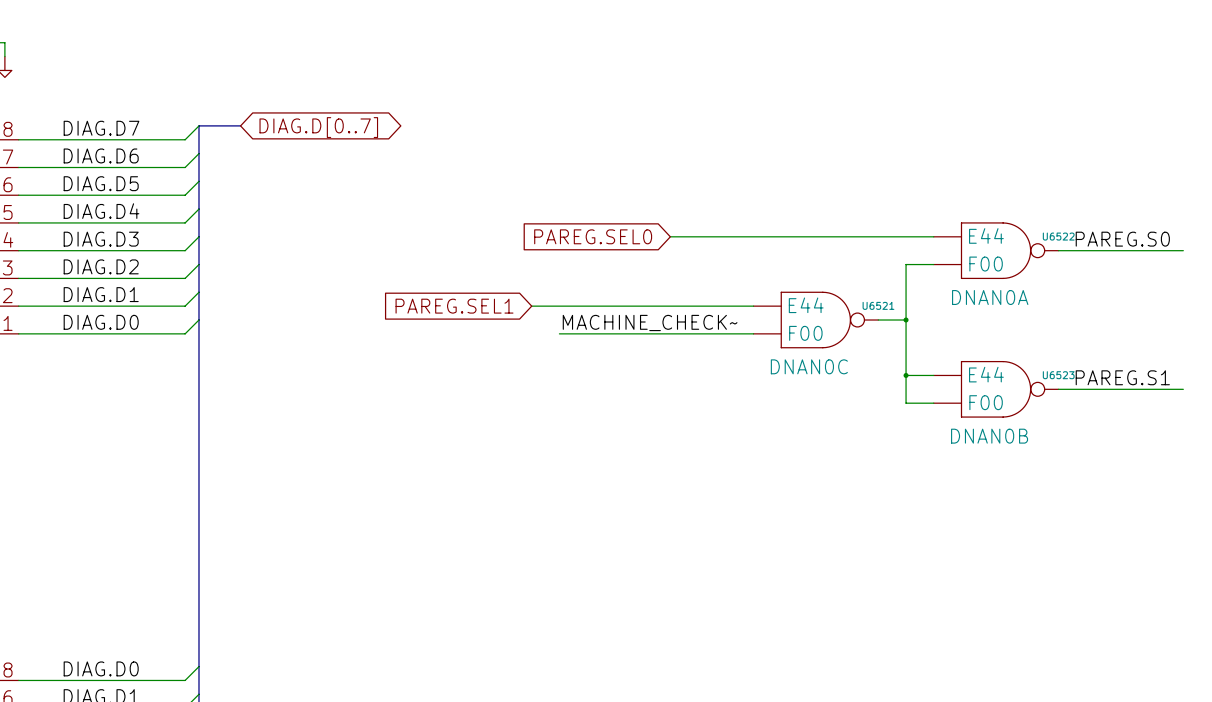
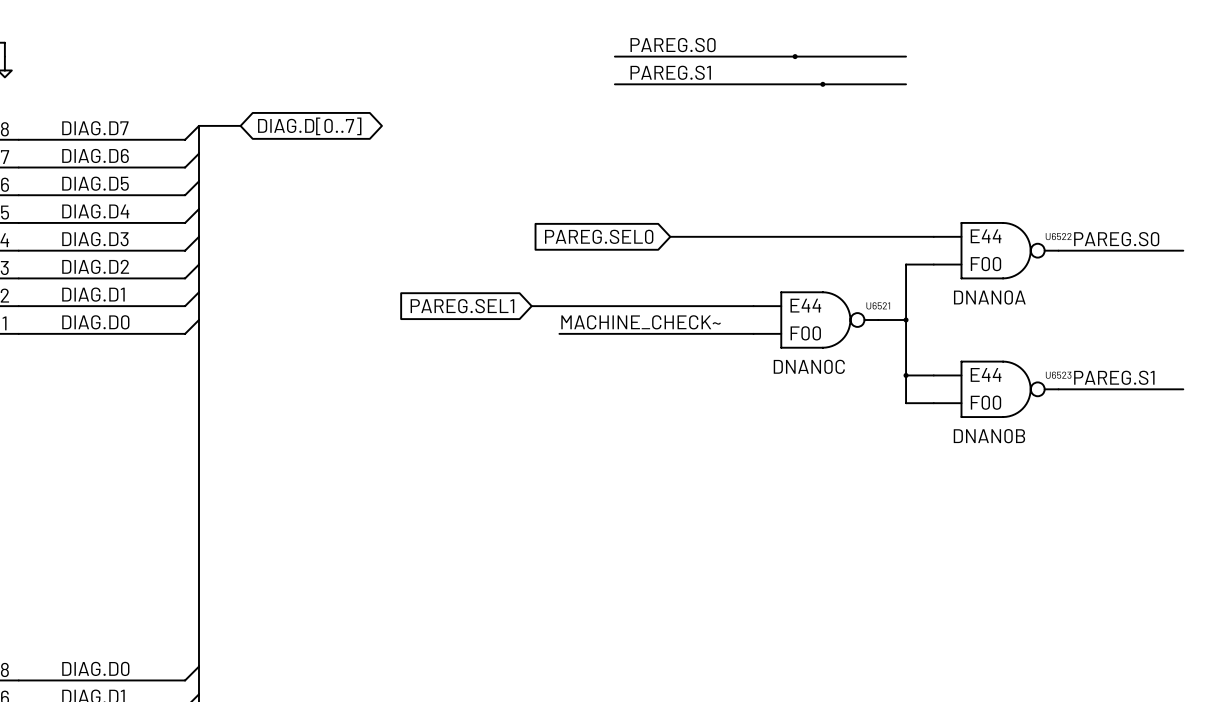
label: none -> PAREG.S0 (673, 45)
wire: none -> (614, 56) (906, 56)
junction: none -> (795, 56)
label: none -> PAREG.S1 (670, 72)
wire: none -> (614, 84) (906, 84)
junction: none -> (822, 84)

